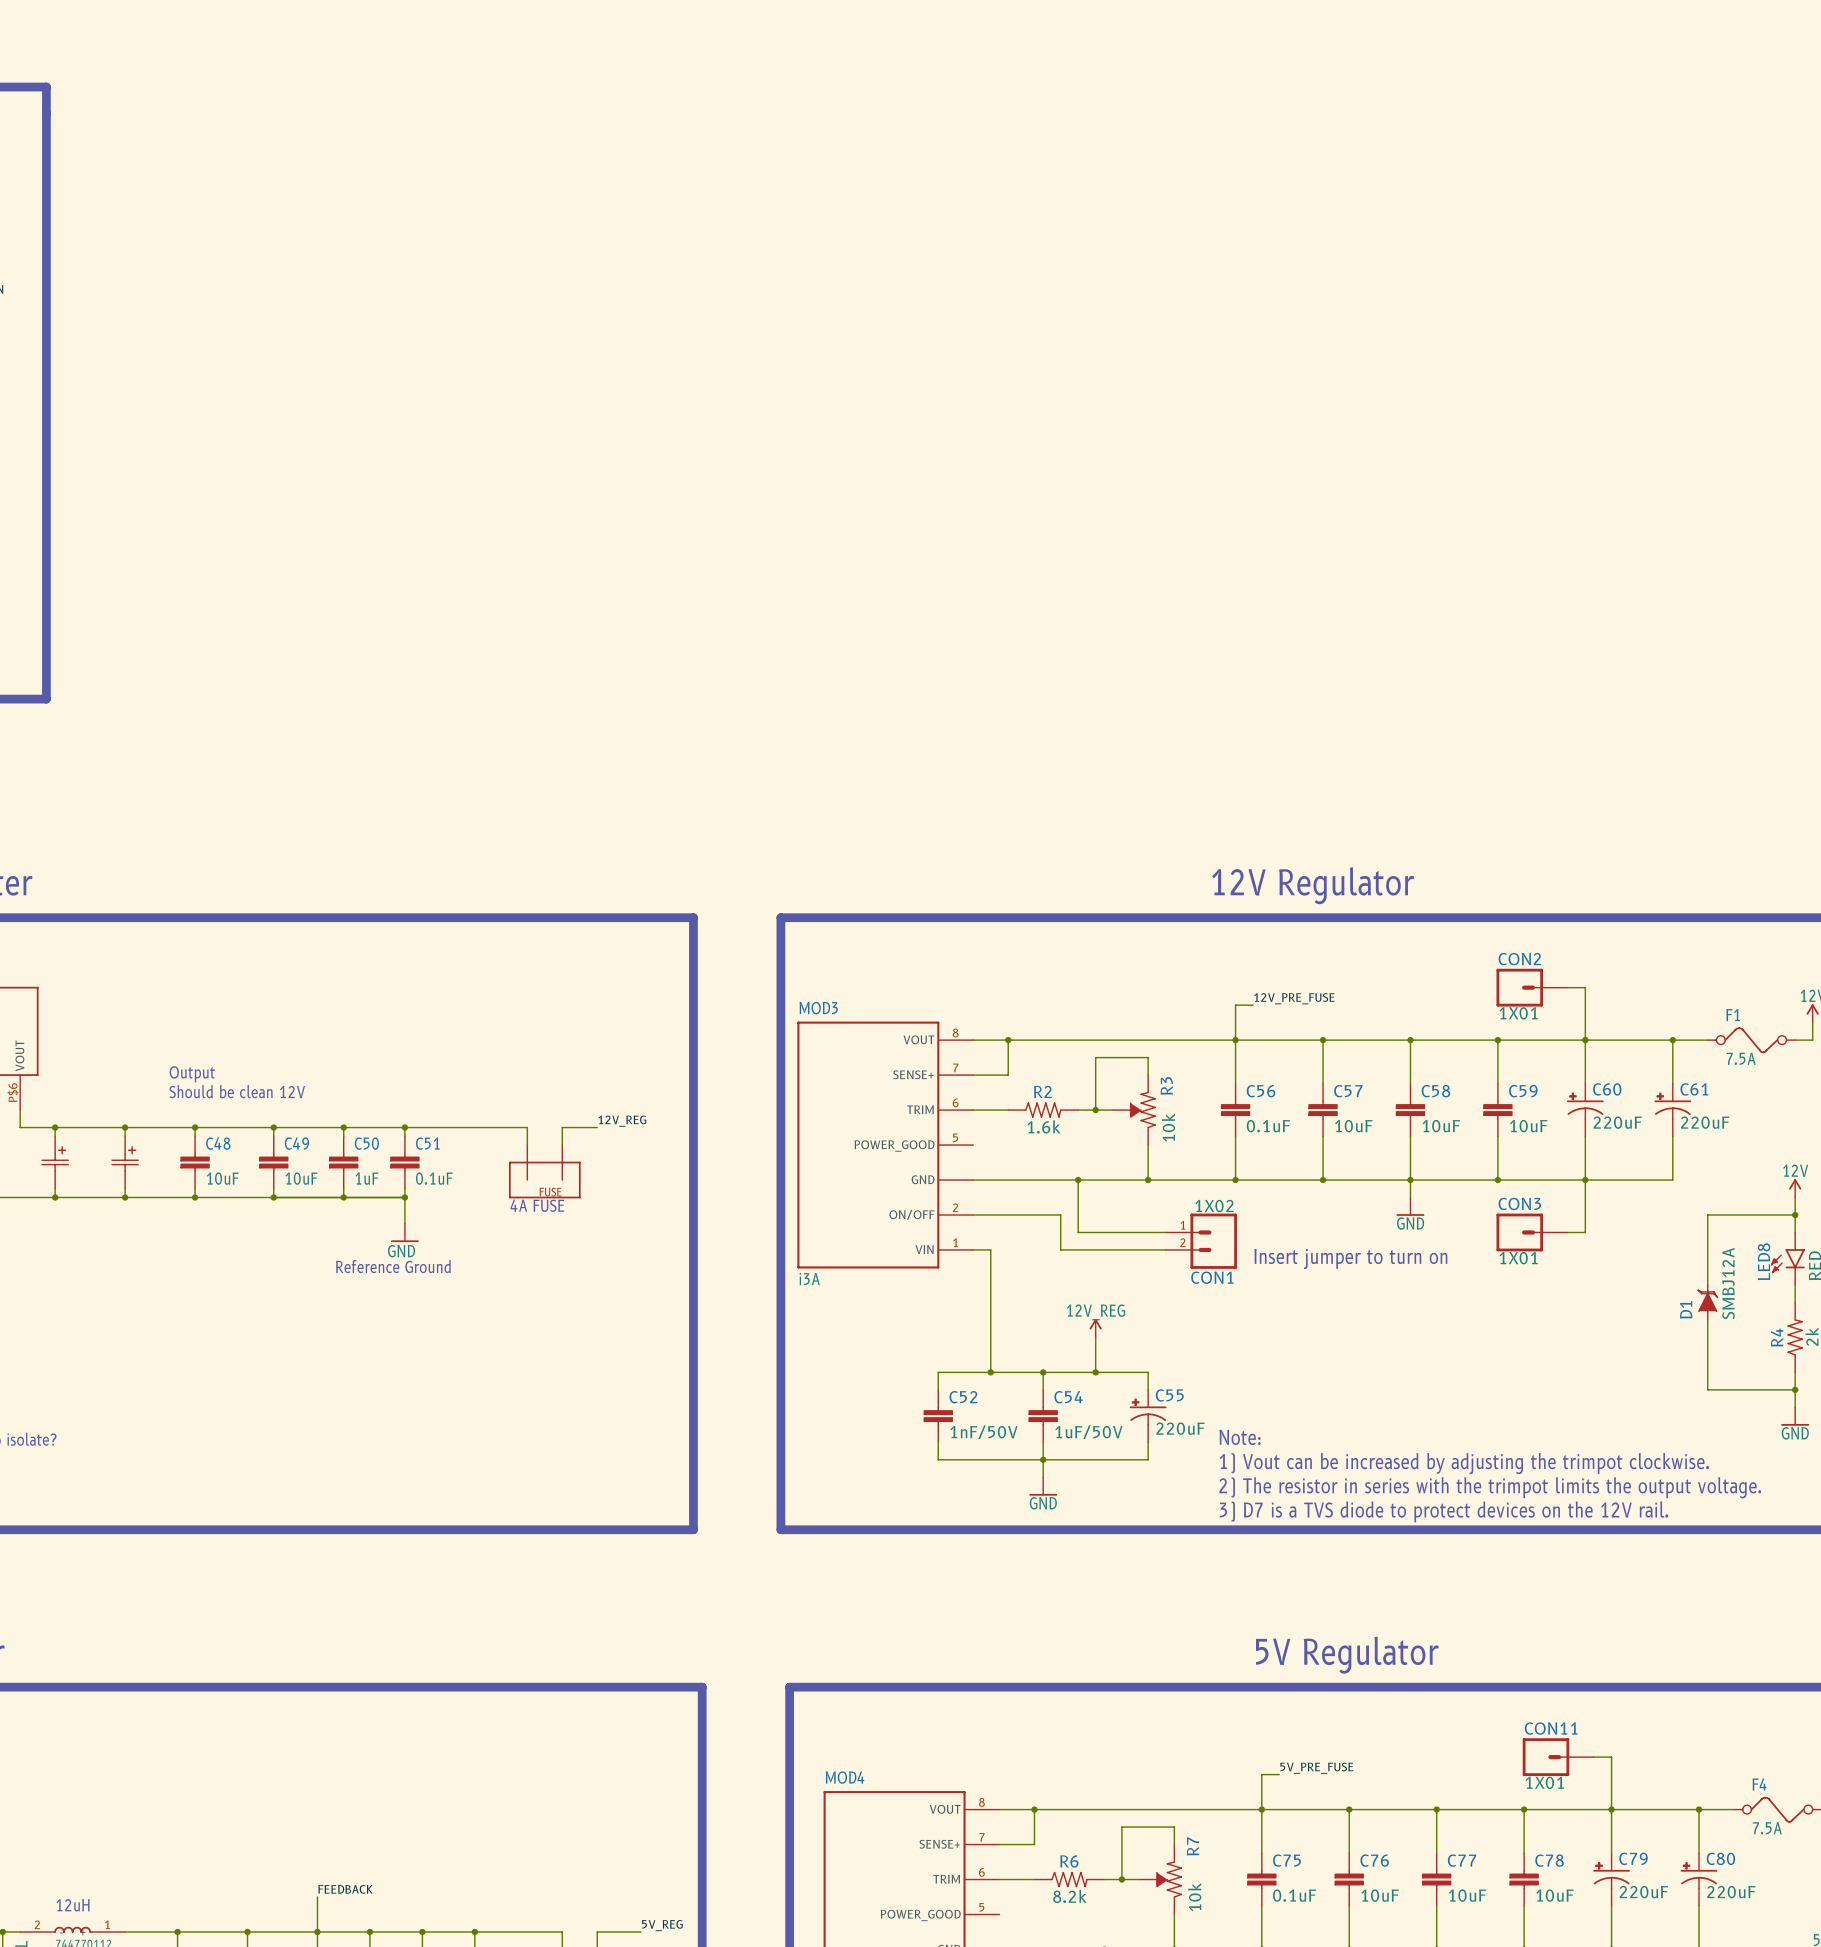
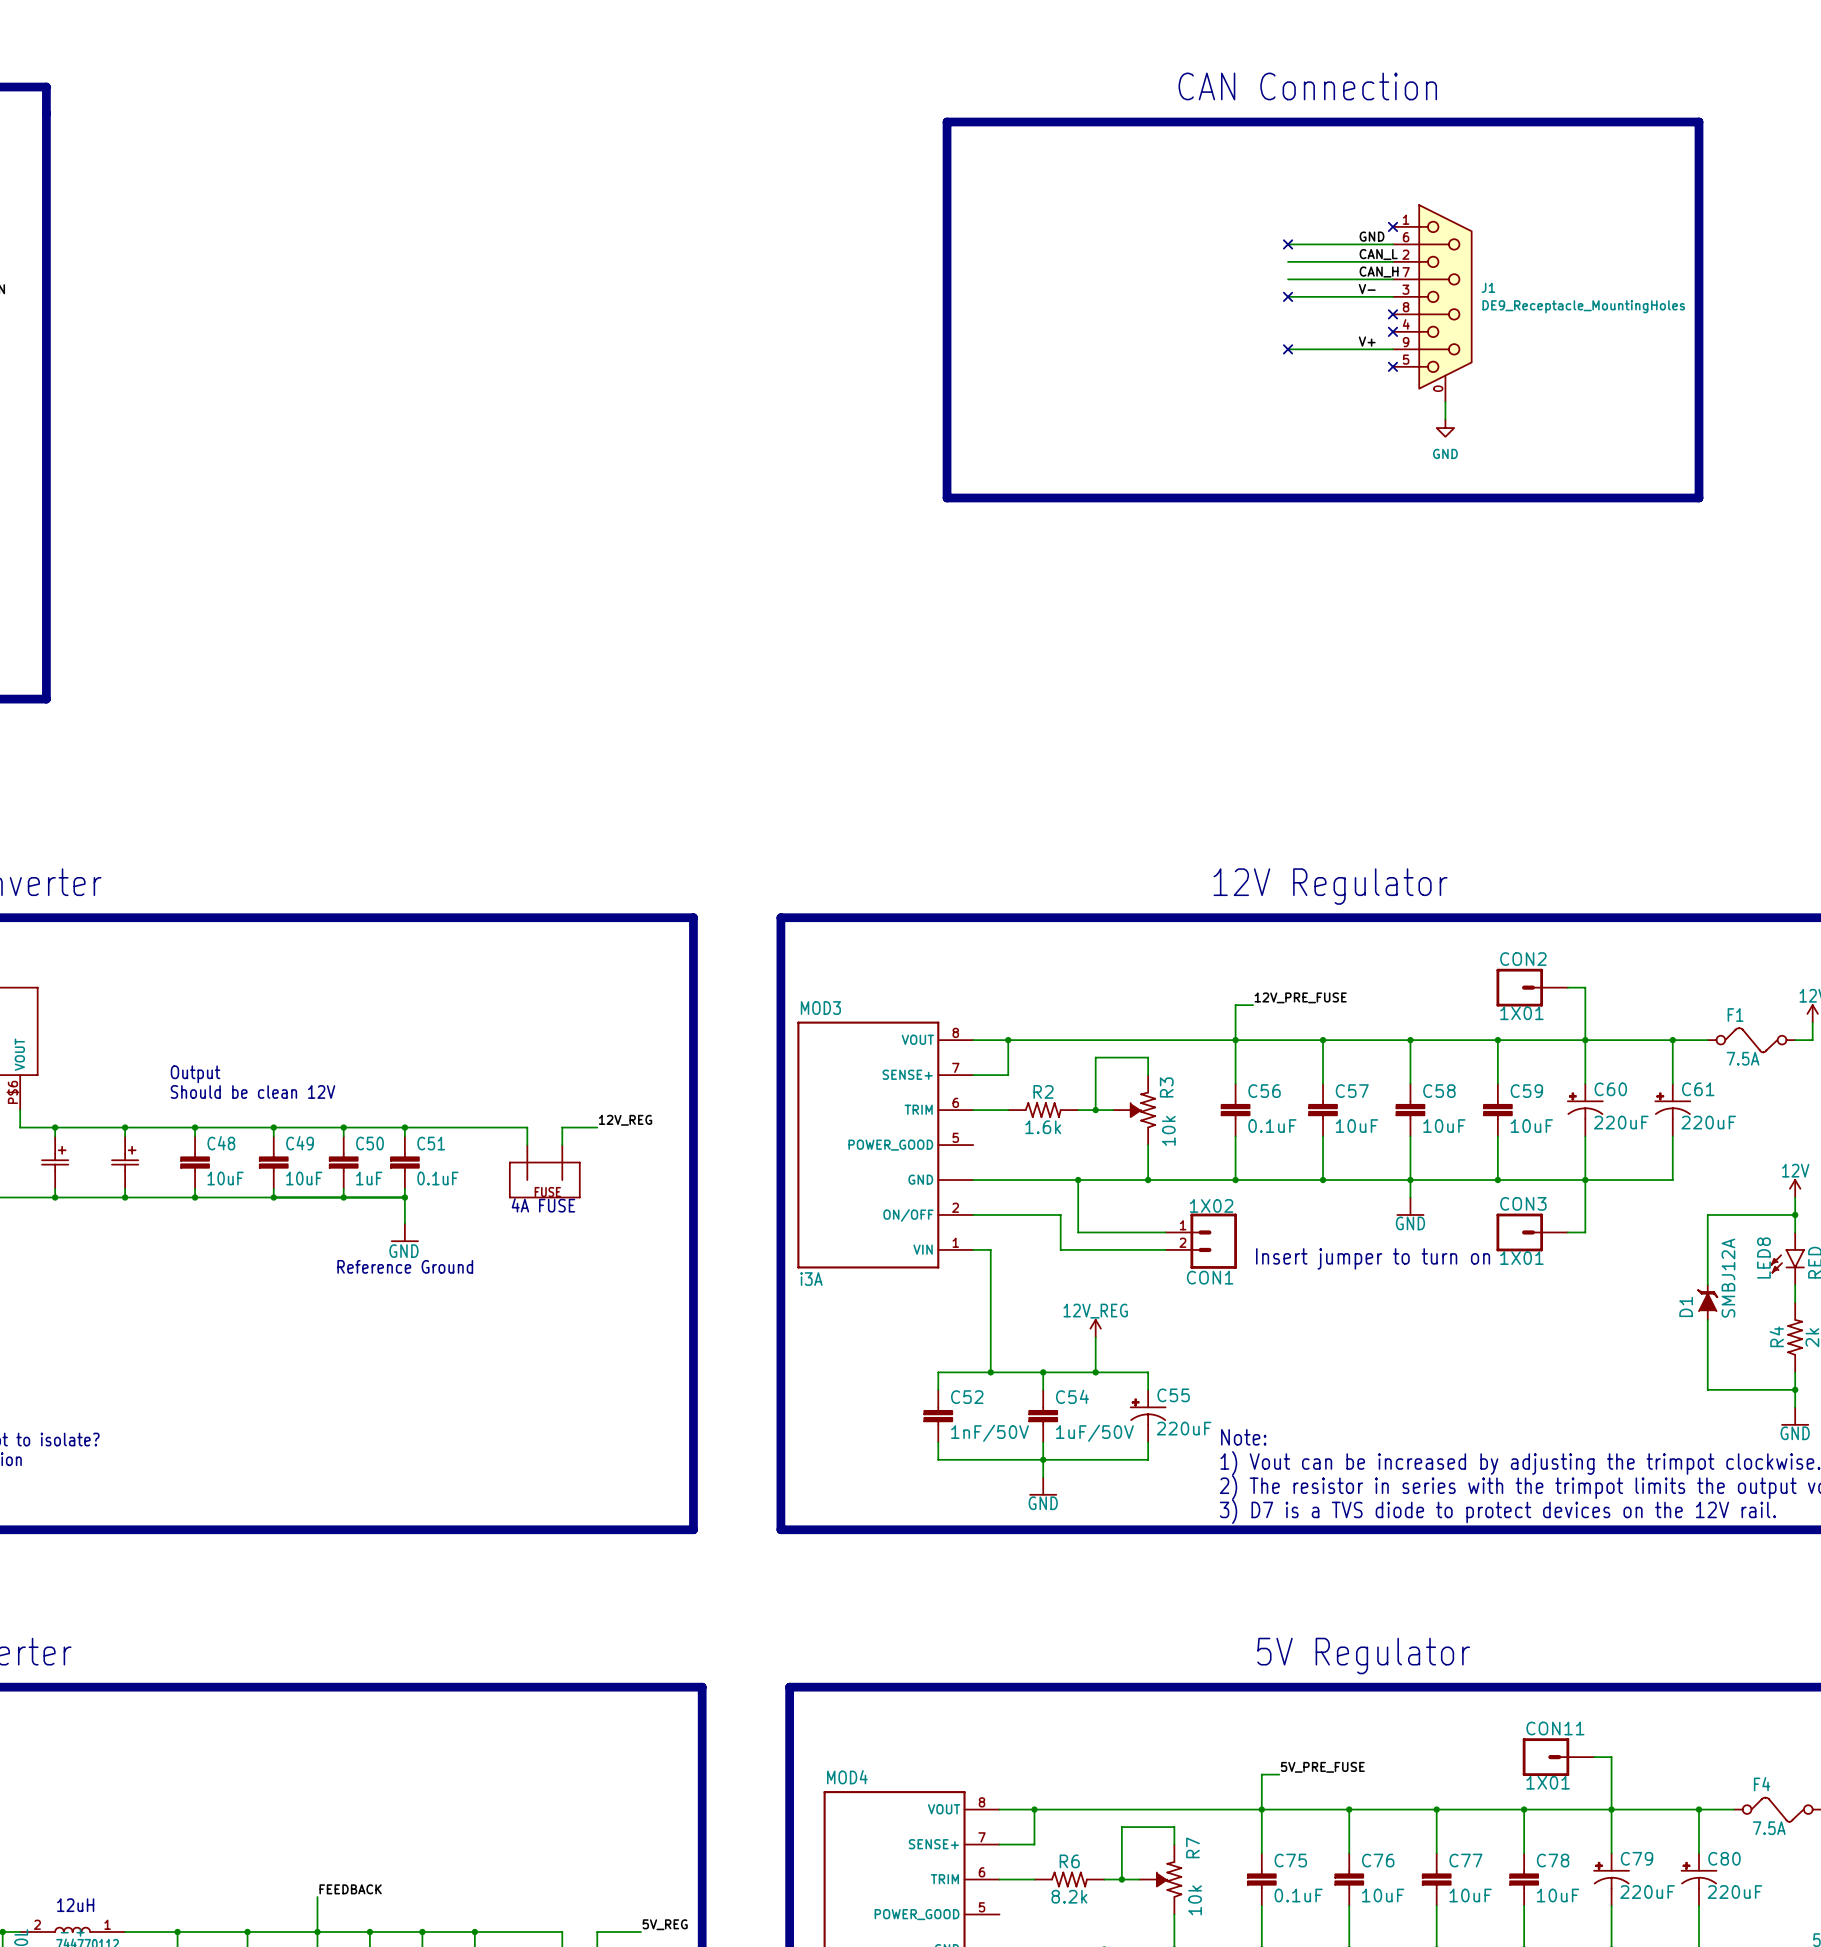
text: none -> CAN Connection (1307, 86)
line: none -> (947, 122) (1699, 122) (1699, 497) (947, 497) (947, 122)
no-connect mark: none -> (1392, 226)
label: none -> GND (1372, 236)
wire: none -> (1288, 244) (1392, 244)
no-connect mark: none -> (1288, 244)
label: none -> CAN_L (1378, 254)
wire: none -> (1288, 261) (1392, 261)
label: none -> CAN_H (1379, 272)
wire: none -> (1288, 279) (1392, 279)
label: none -> V- (1367, 289)
wire: none -> (1288, 296) (1392, 296)
no-connect mark: none -> (1288, 296)
J1: none -> DE9_Receptacle_MountingHoles (1432, 303)
no-connect mark: none -> (1392, 314)
no-connect mark: none -> (1392, 331)
label: none -> V+ (1367, 341)
wire: none -> (1288, 349) (1392, 349)
no-connect mark: none -> (1288, 349)
no-connect mark: none -> (1392, 366)
wire: none -> (1445, 401) (1445, 419)
power symbol: none -> GND (1445, 428)

